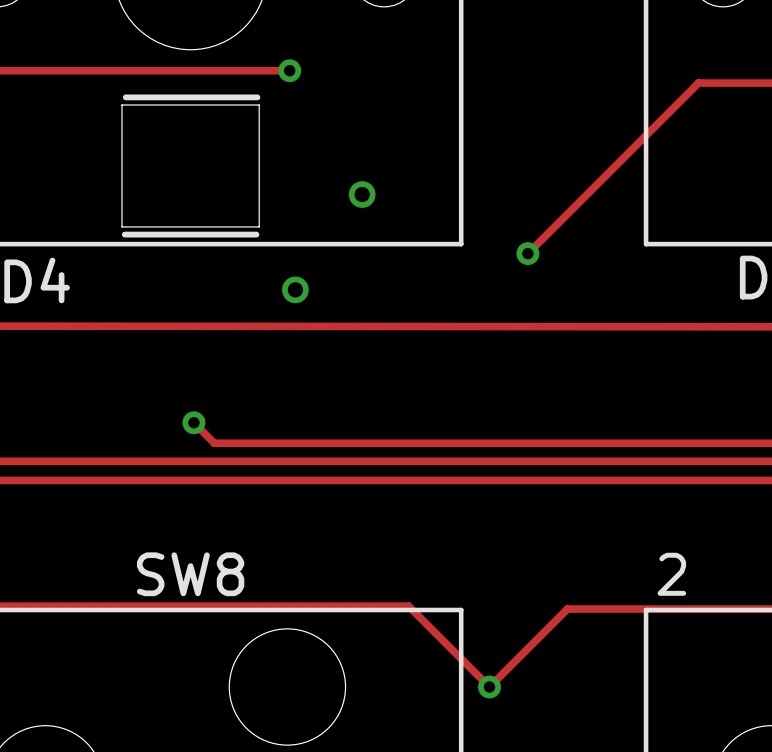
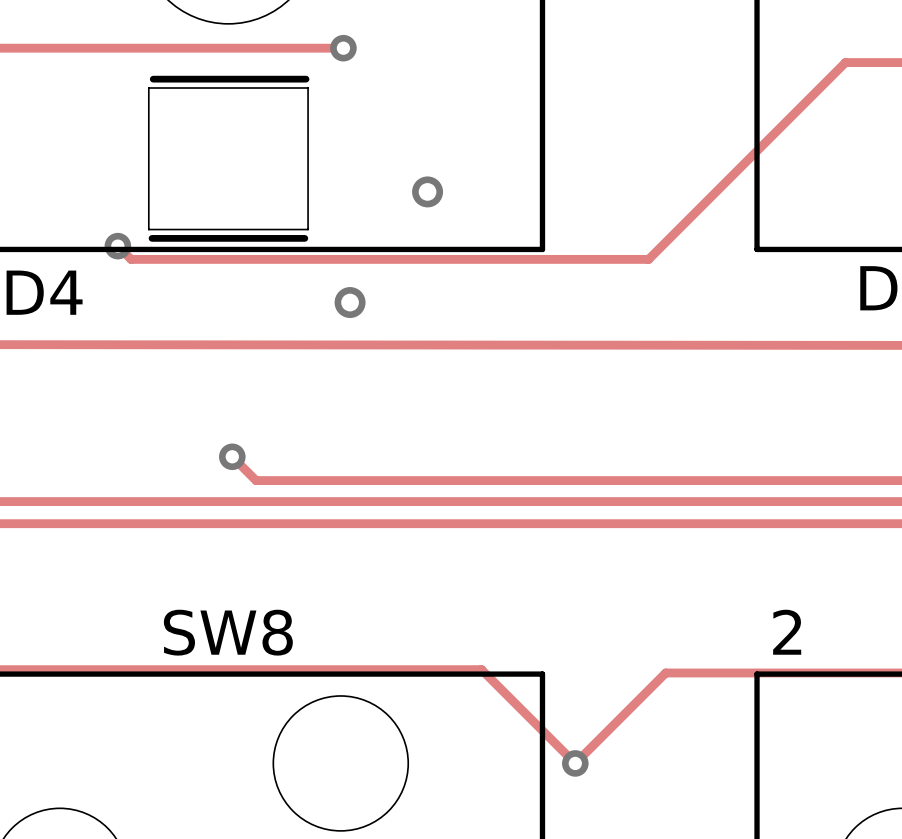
track: (722, 83) (698, 83) (527, 253) -> (845, 62) (648, 259) (131, 259) (117, 246)
via: none -> (117, 246)
via: (527, 253) -> none

